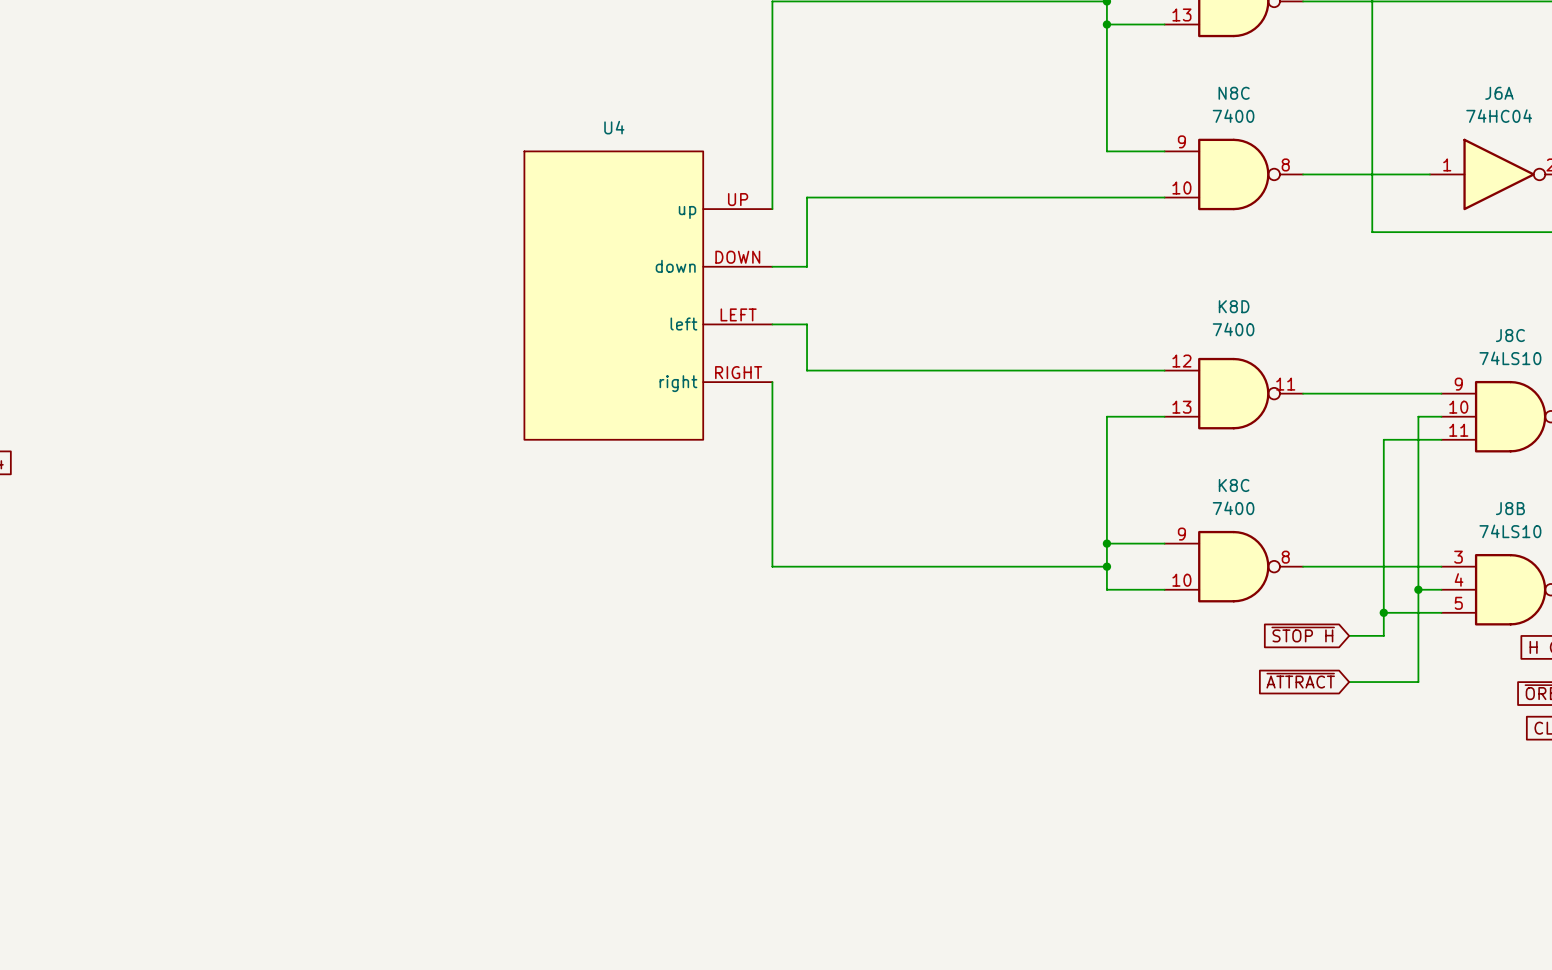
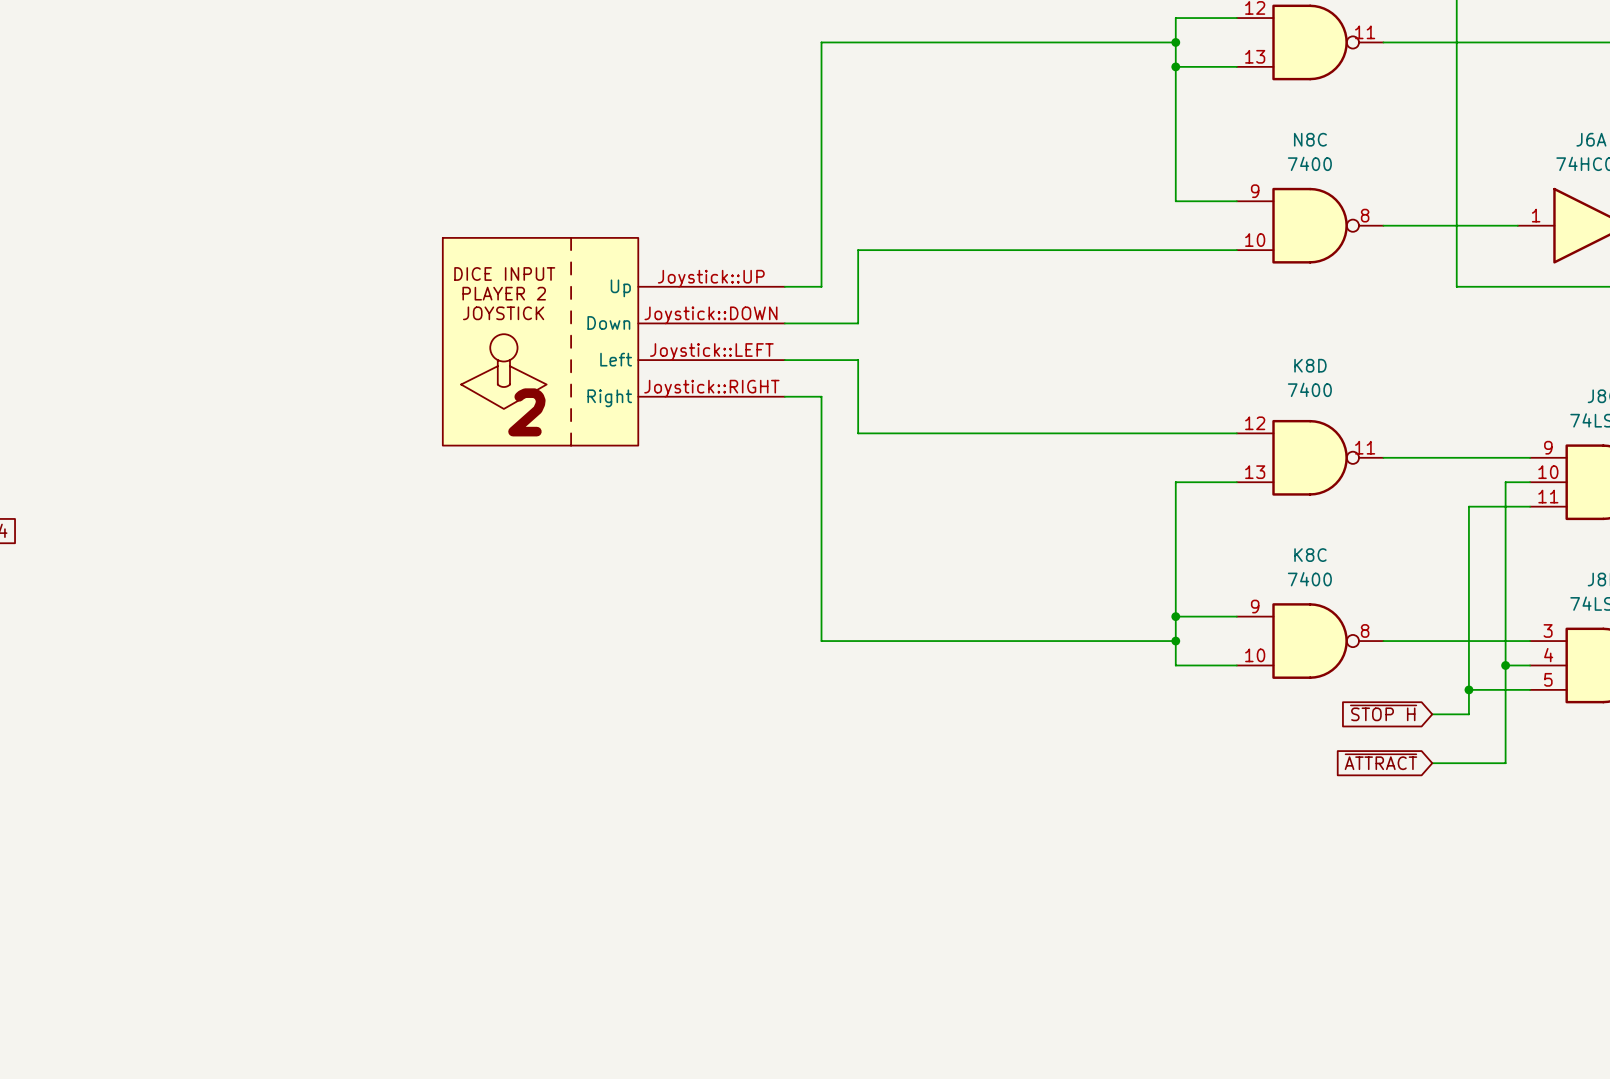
wire: none -> (821, 262) (821, 286) (784, 286)
part: none -> (613, 341)
U4: (648, 295) -> none
wire: (772, 324) (807, 324) -> (784, 360) (858, 360) (858, 384)
wire: none -> (784, 396) (821, 396) (821, 445)

